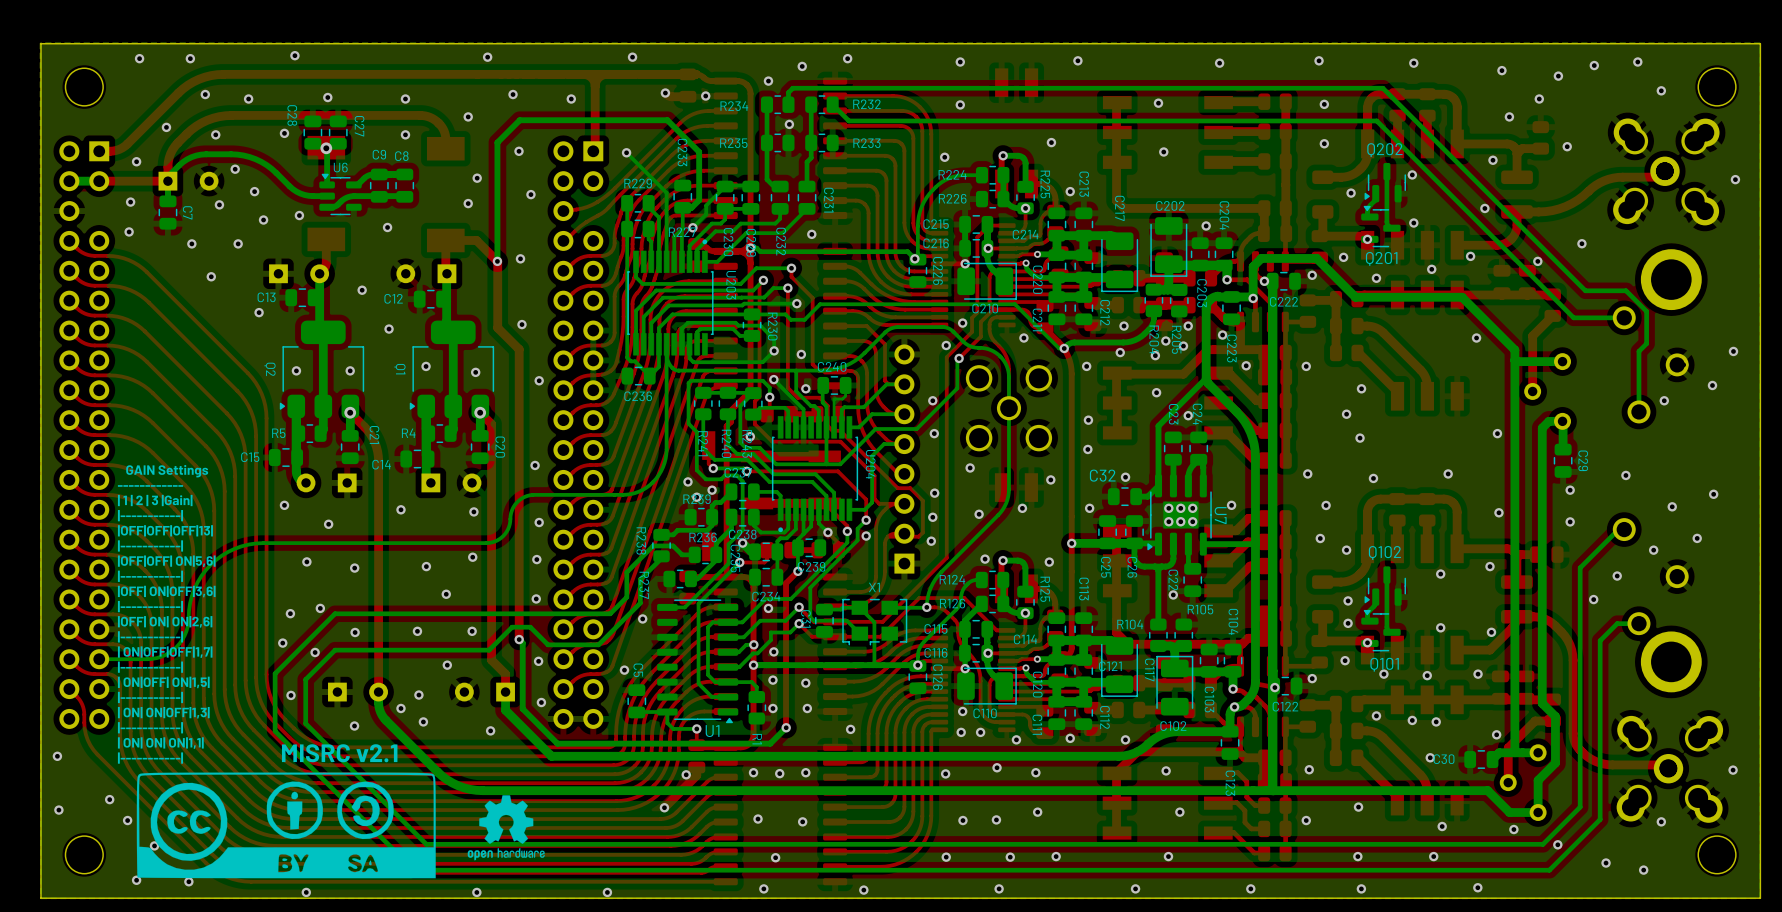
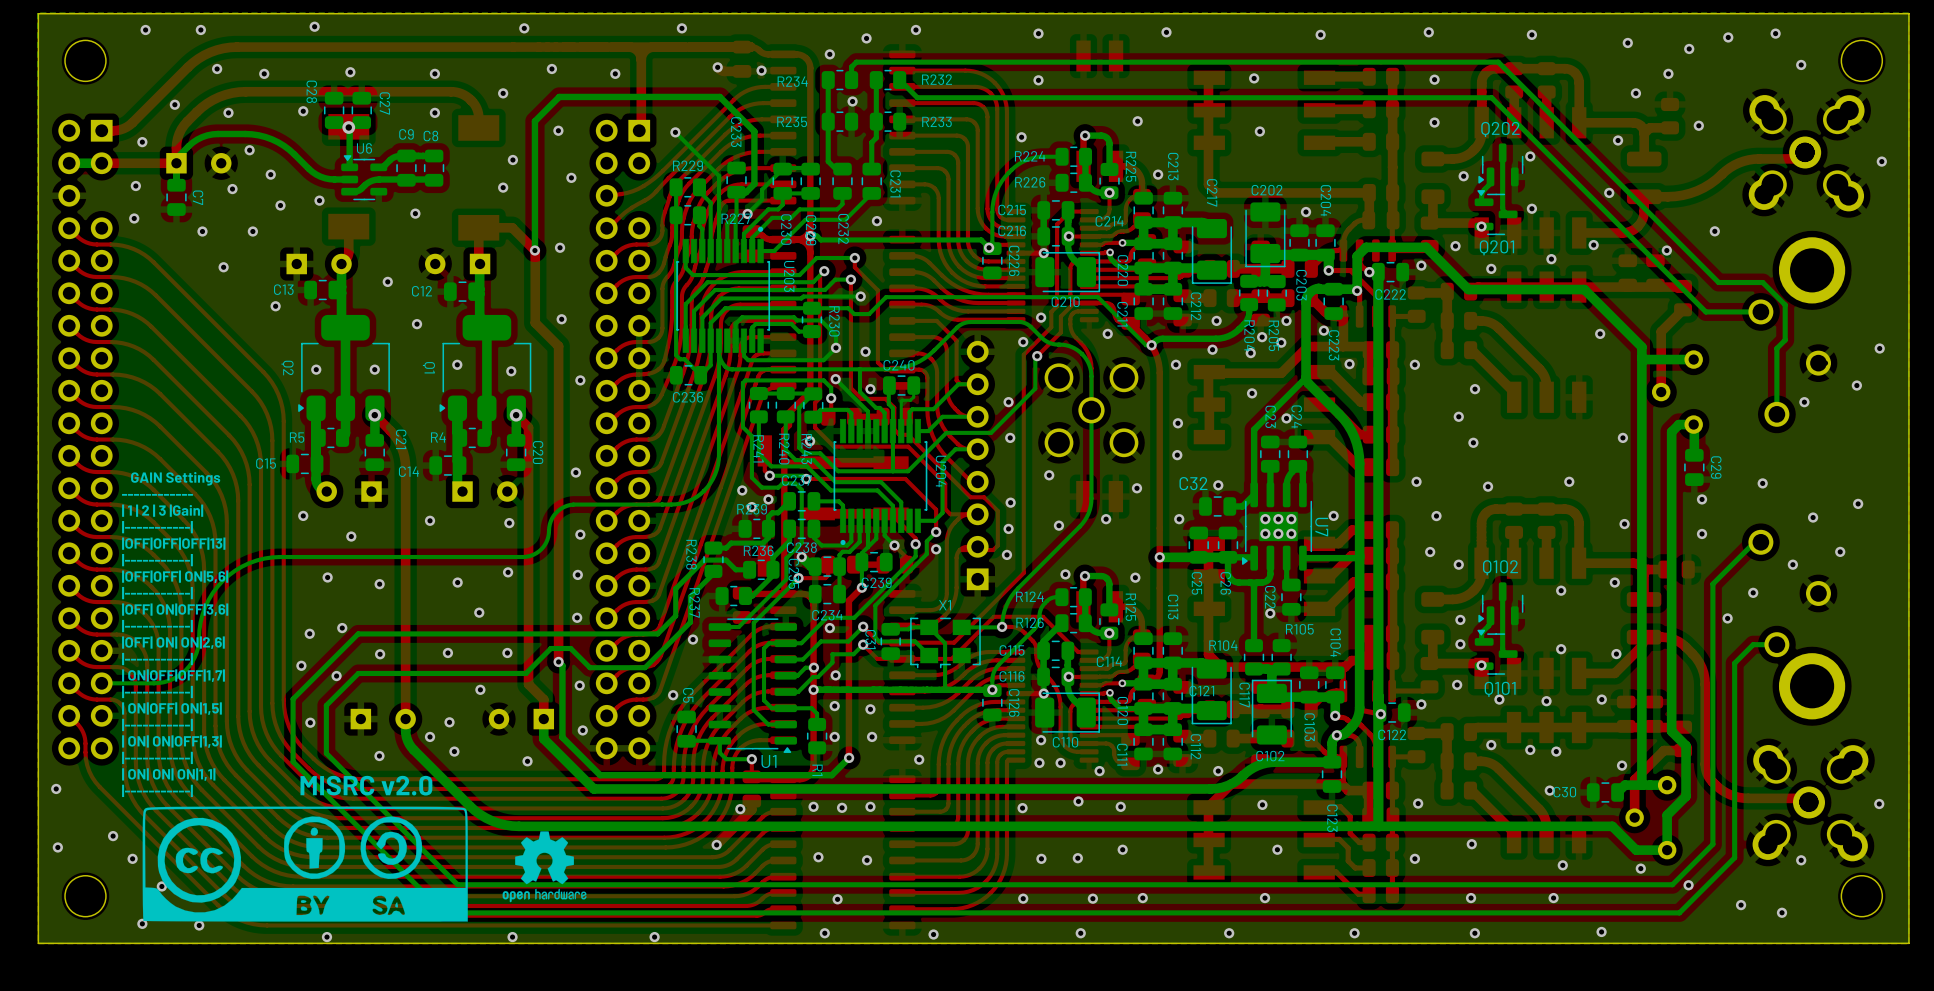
text: MISRC v2.1 (339, 753) -> MISRC v2.0 (366, 785)

